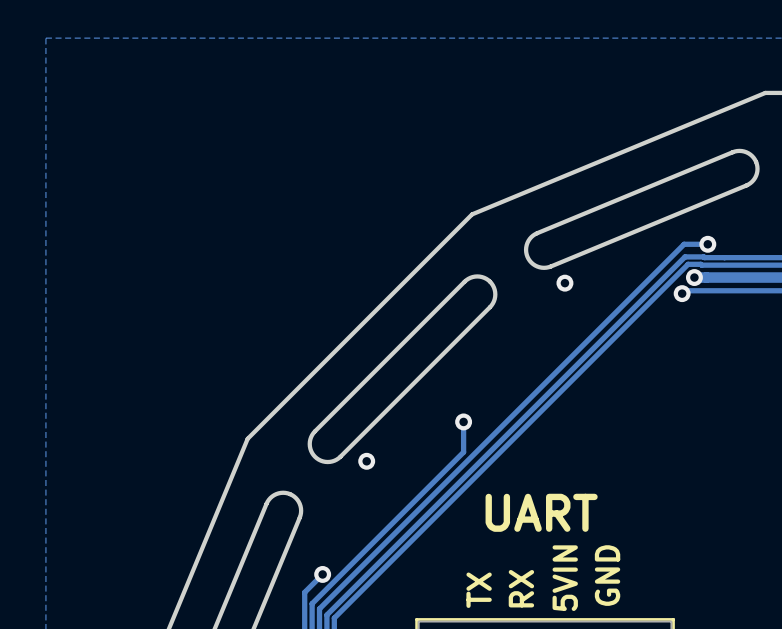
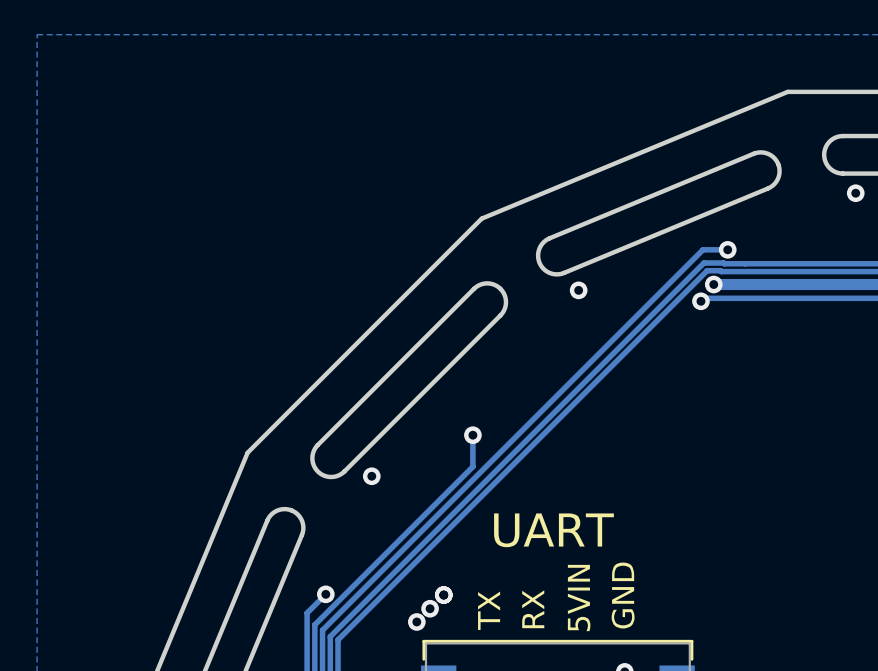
via: none -> (443, 595)
via: none -> (430, 608)
via: none -> (416, 621)

